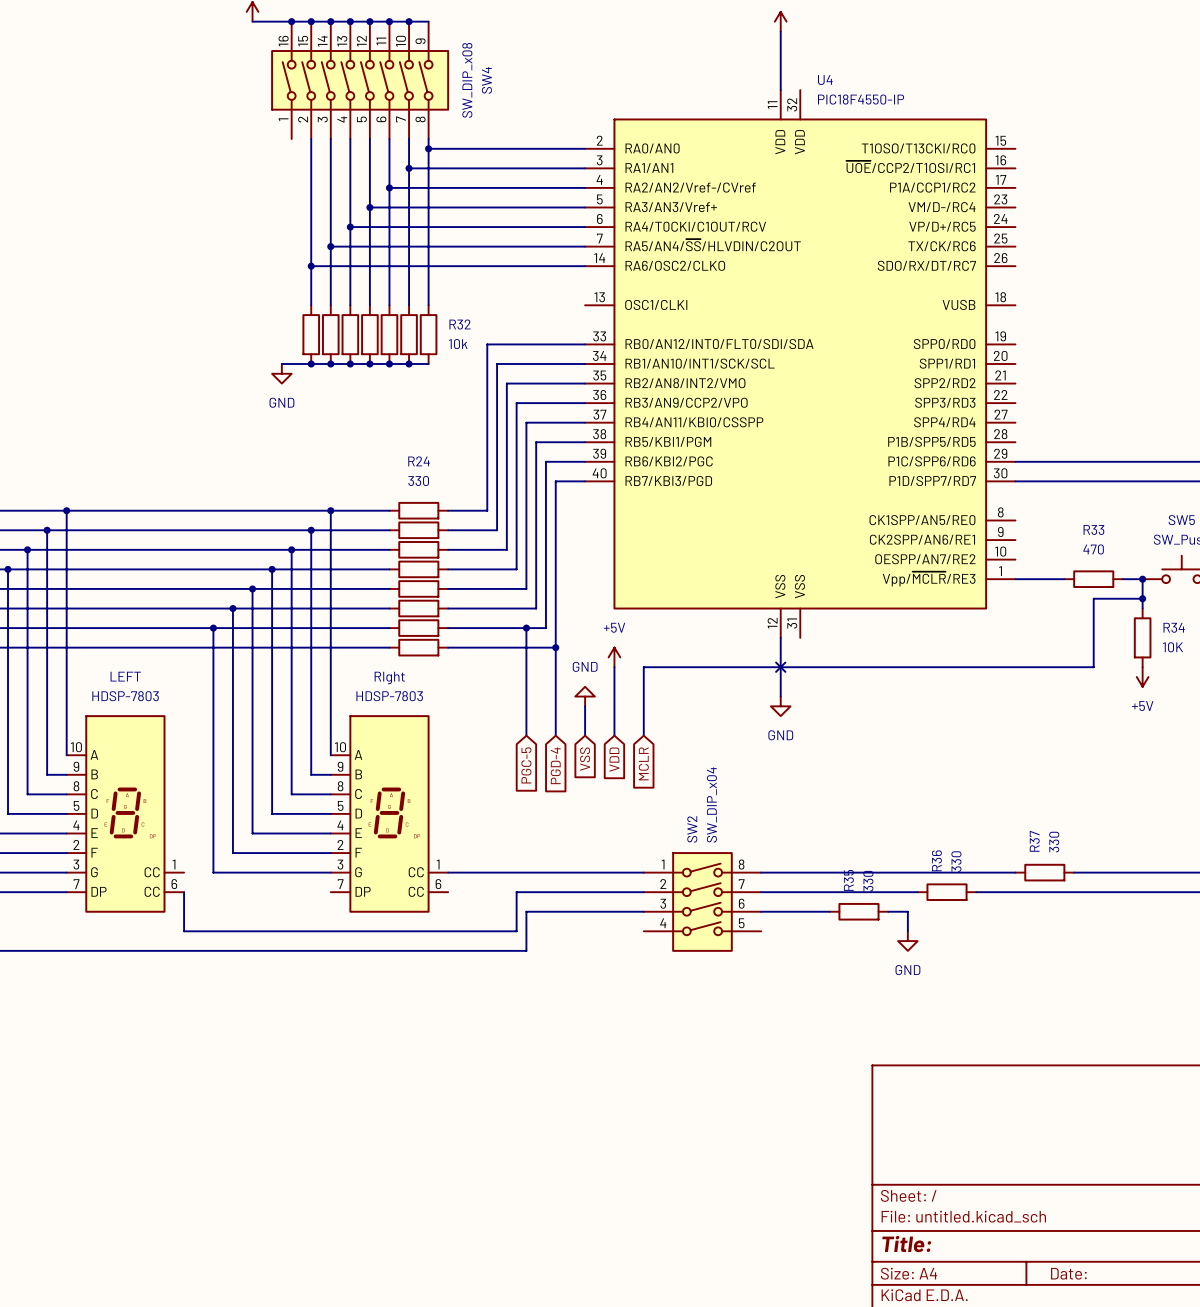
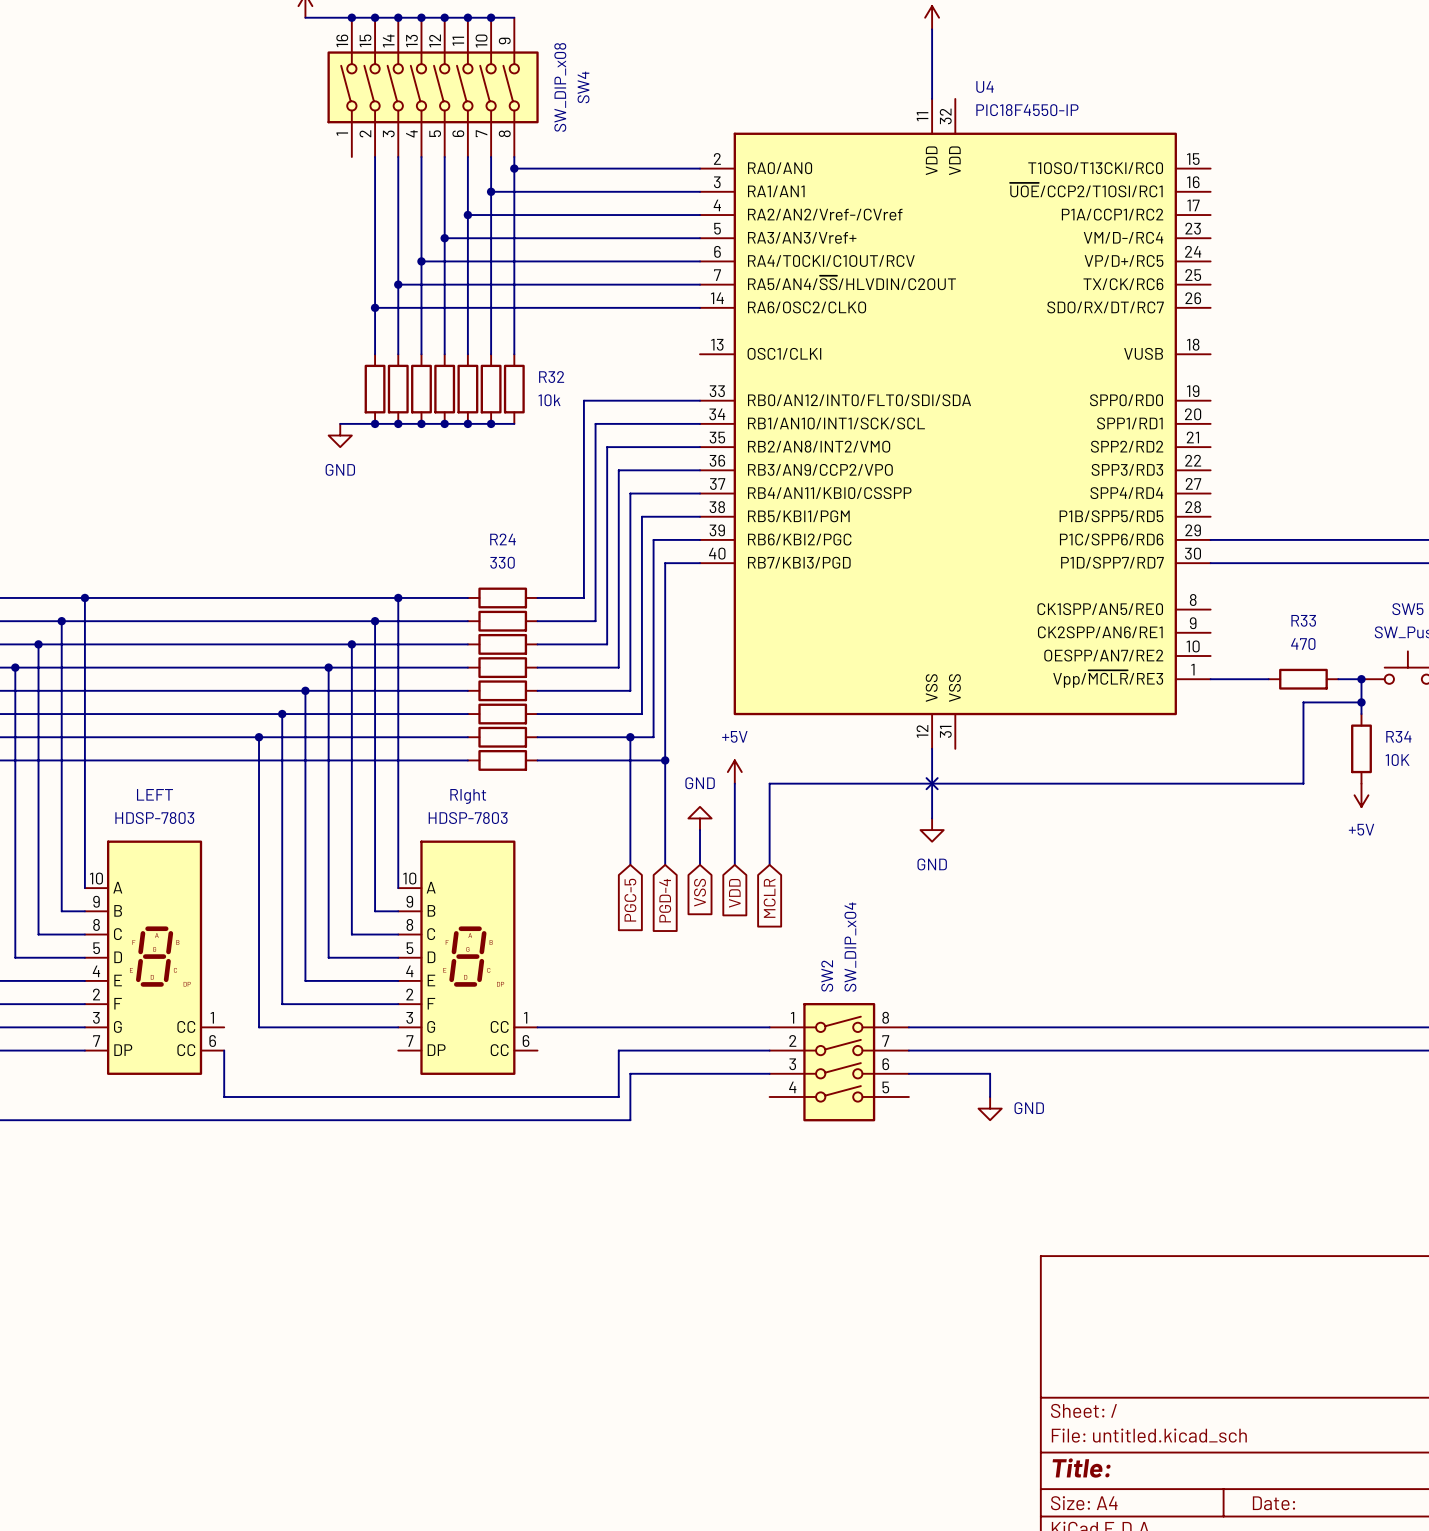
wire: none -> (1210, 1027) (1280, 1027)
R37: 330 (1044, 872) -> none
wire: none -> (1094, 1050) (1164, 1050)
R36: 330 (947, 892) -> none
wire: none -> (990, 1073) (990, 1096)
R35: 330 (858, 911) -> none
wire: (888, 911) (907, 911) (907, 931) -> none
power symbol position: GND (907, 941) -> GND (990, 1108)
power symbol text position: GND (907, 970) -> GND (1029, 1108)

